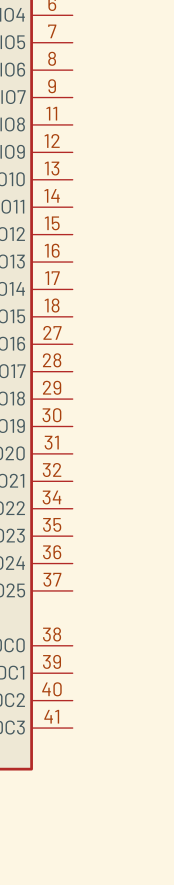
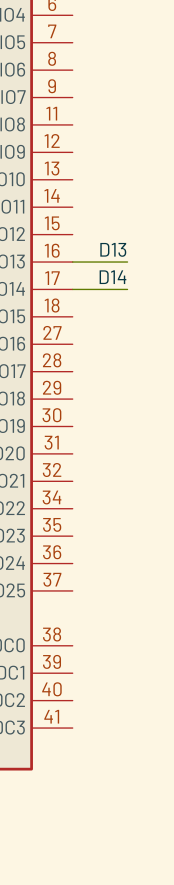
label: none -> D13 (113, 249)
wire: none -> (72, 262) (127, 262)
label: none -> D14 (112, 277)
wire: none -> (72, 289) (127, 289)

